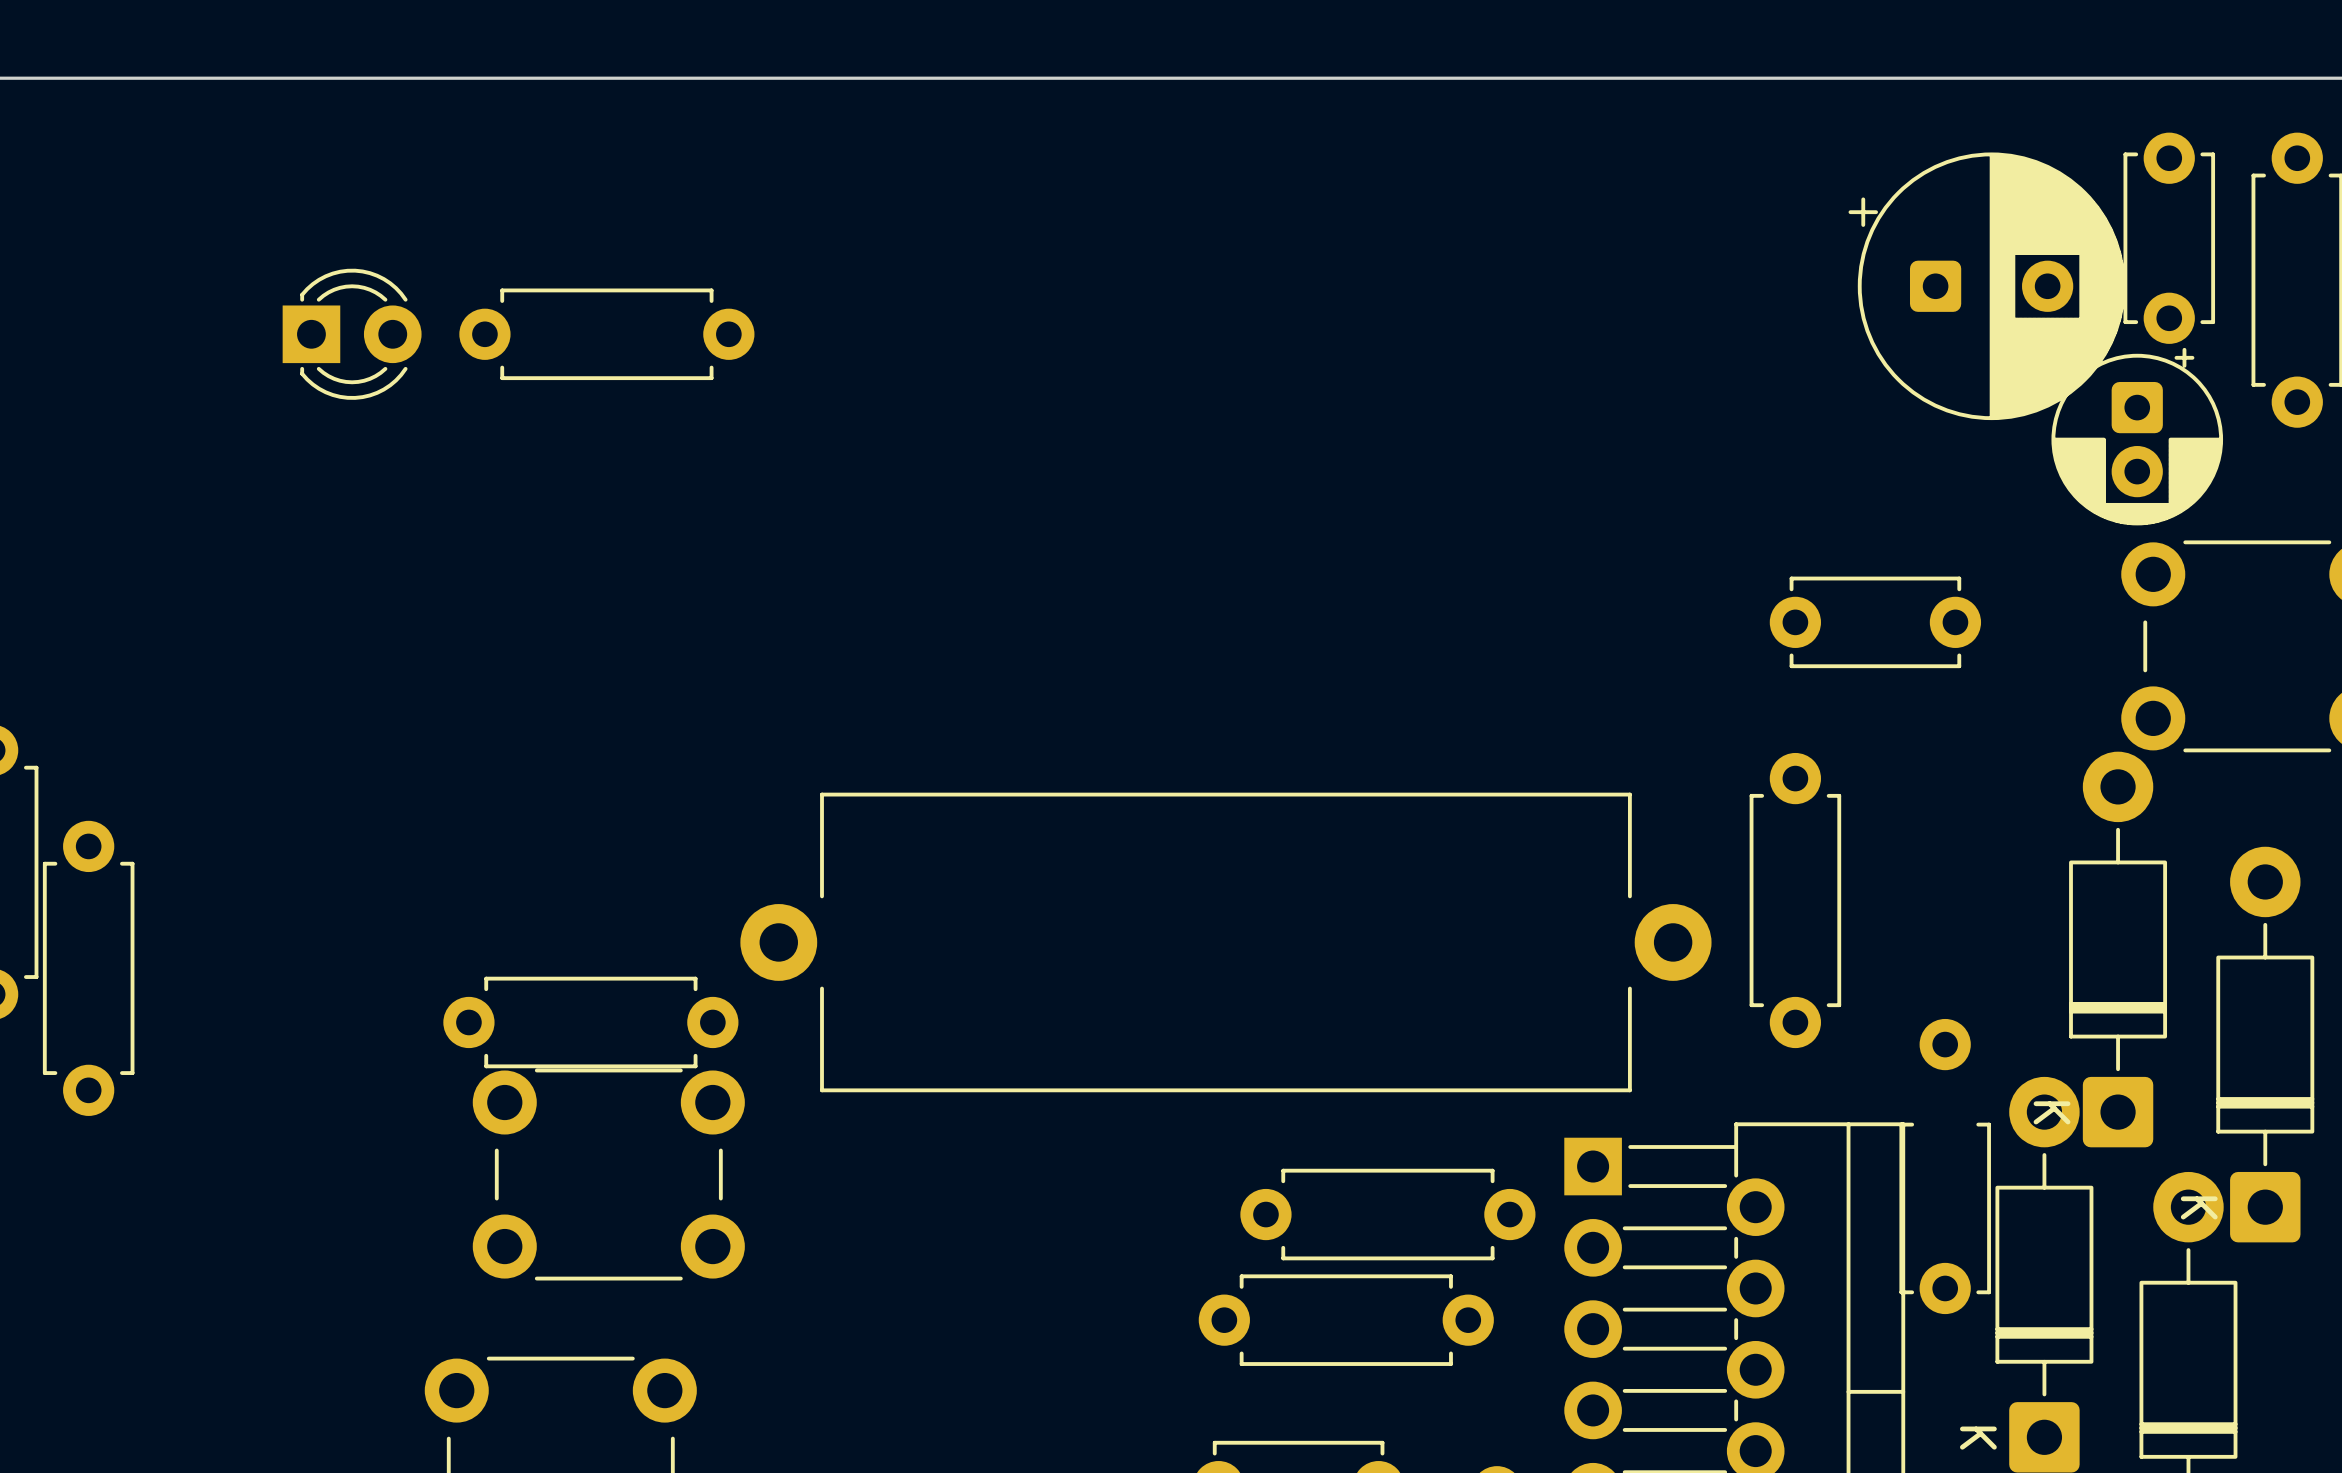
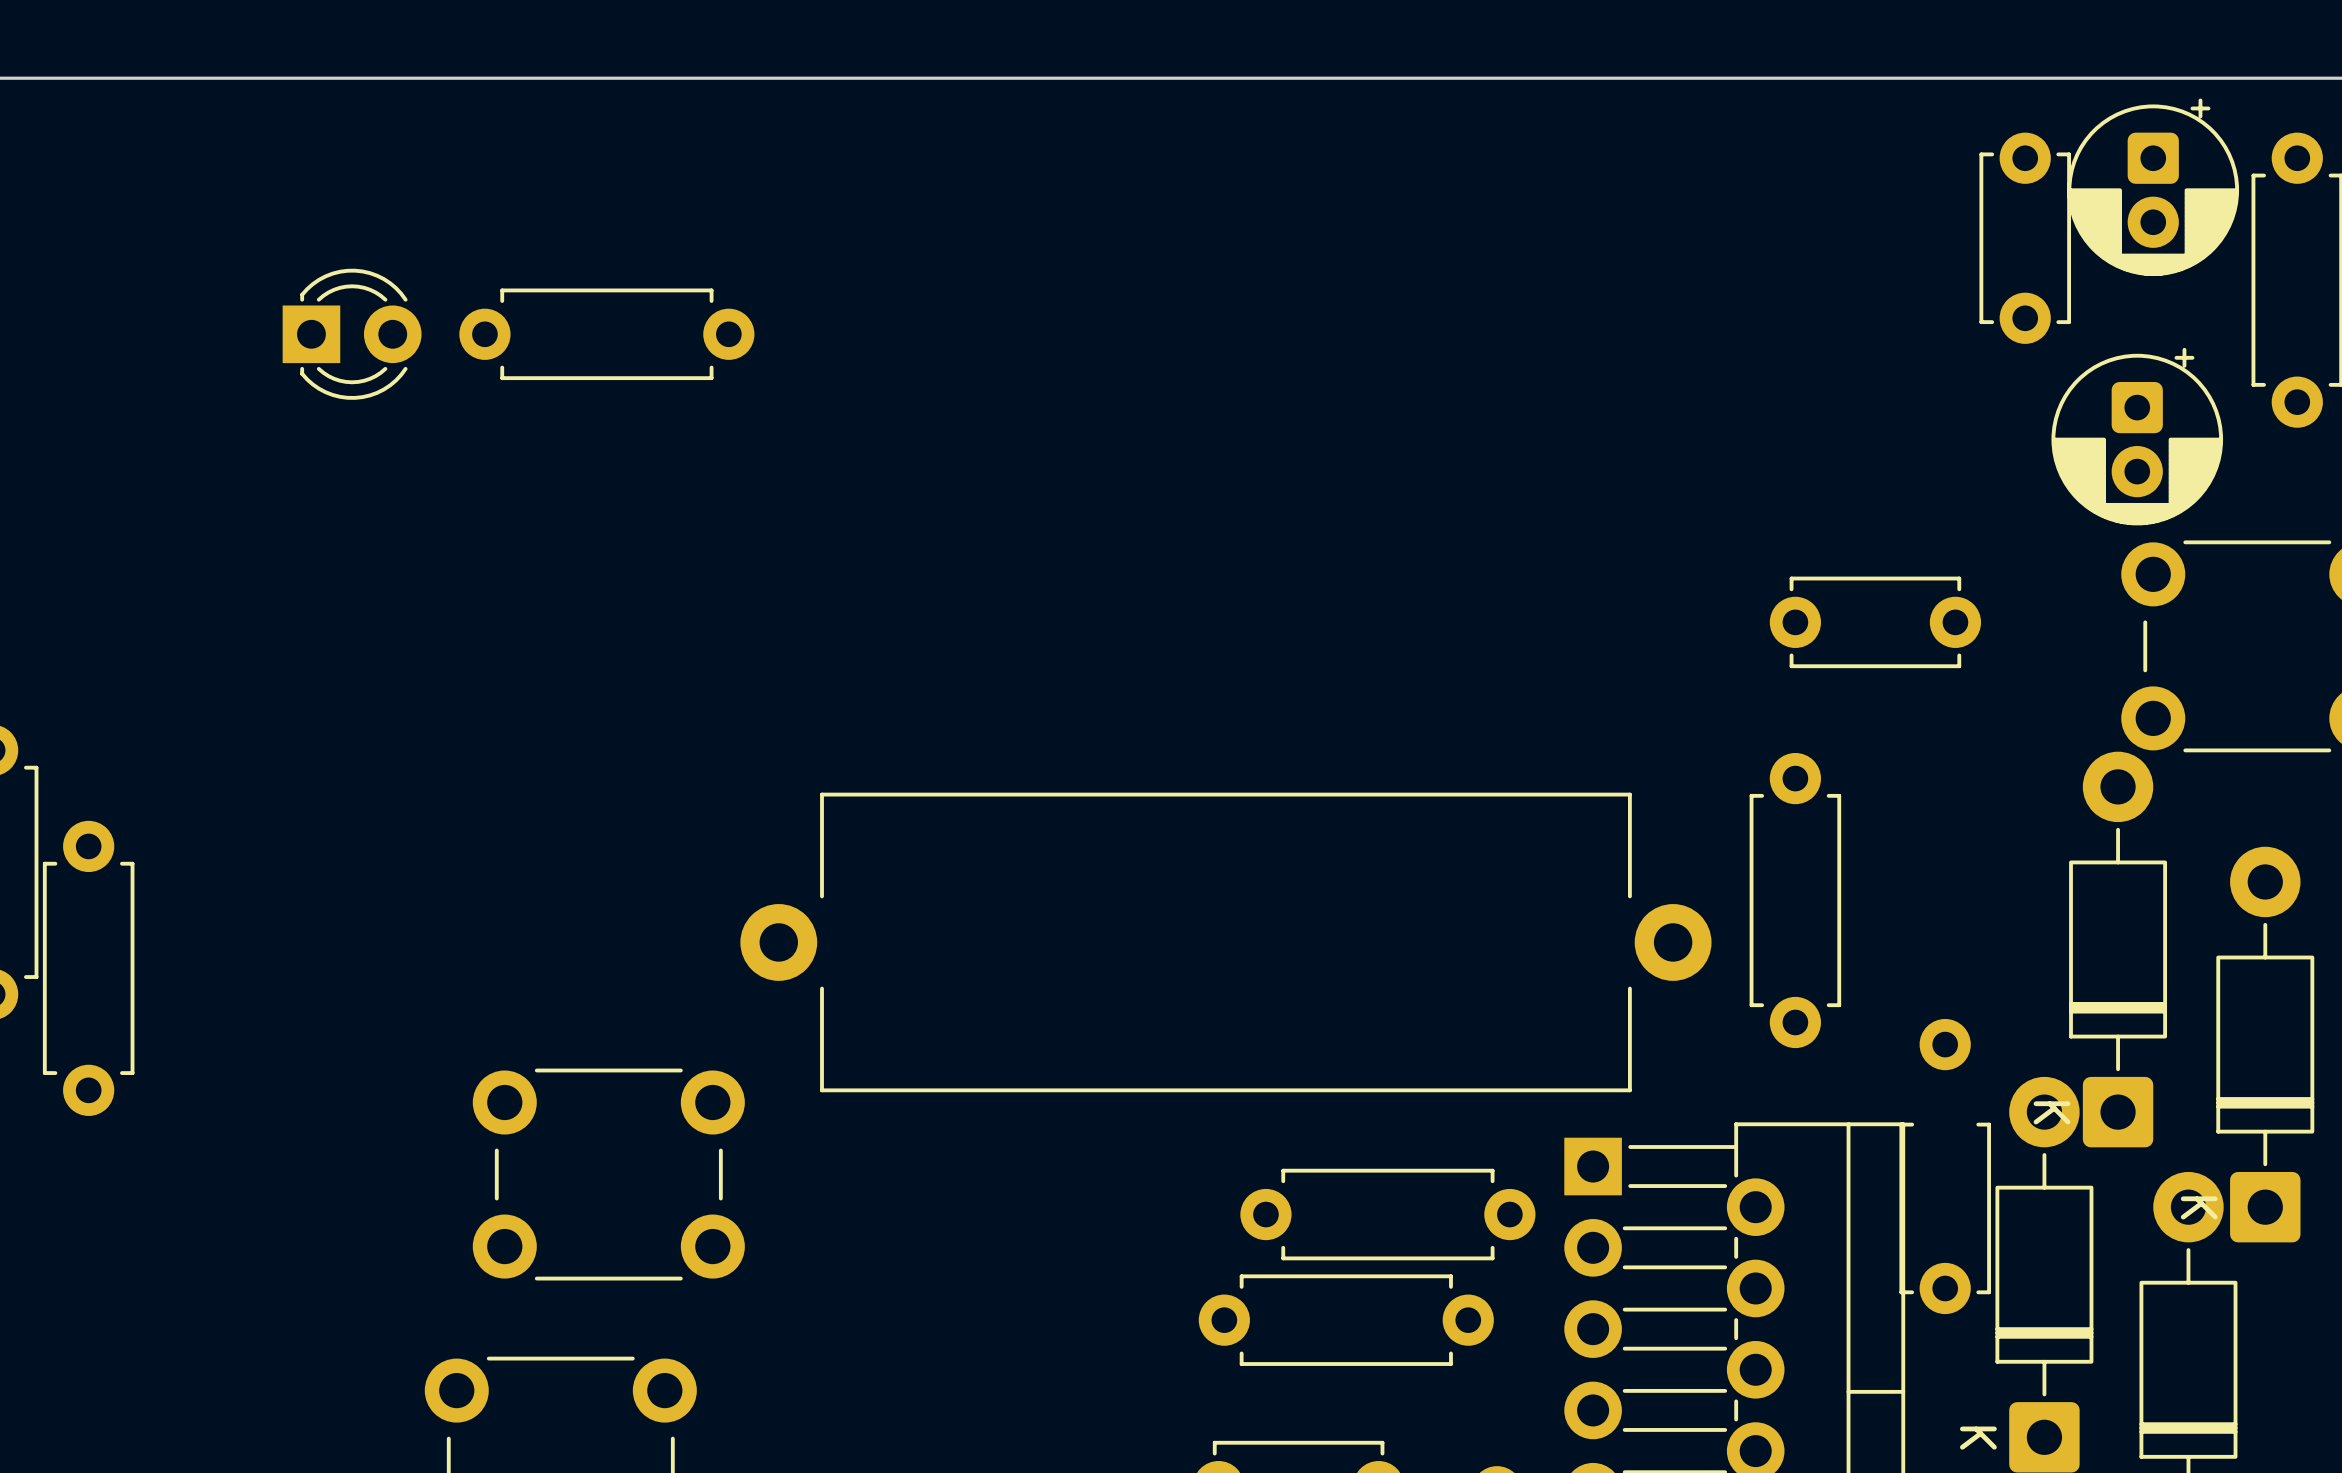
part: none -> (2153, 187)
part position: (2169, 238) -> (2025, 238)
part: (1986, 286) -> none
part: (590, 1022) -> none

